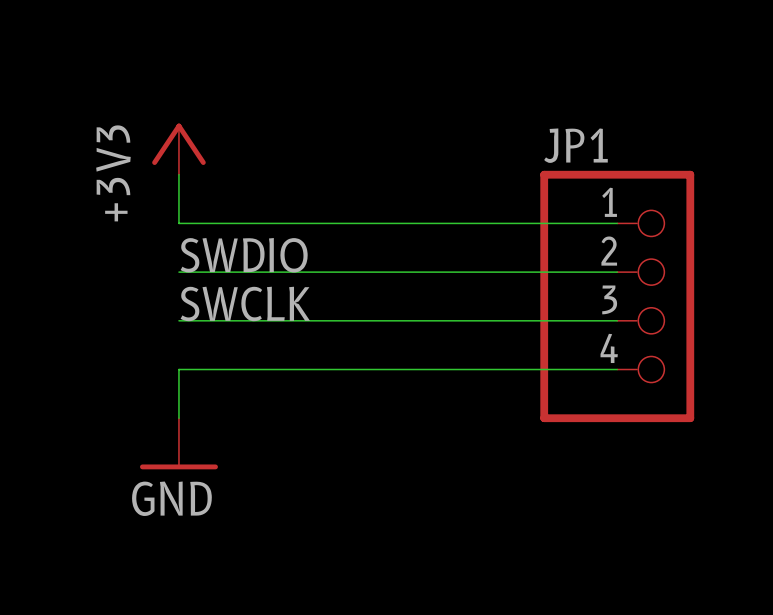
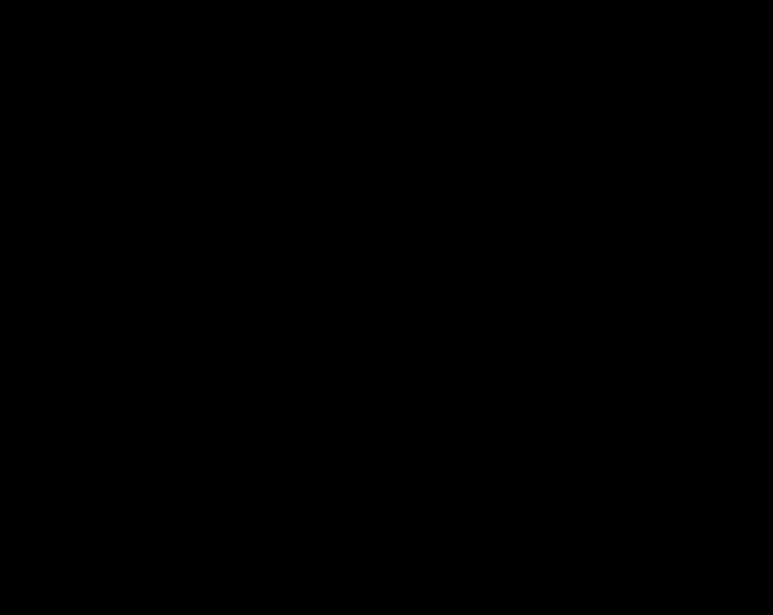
power symbol: +3V3 (178, 149) -> none
wire: (178, 174) (178, 223) (617, 223) -> none
label: SWDIO (244, 255) -> none
wire: (178, 272) (617, 272) -> none
JP1: (617, 296) -> none
label: SWCLK (245, 303) -> none
wire: (178, 320) (617, 320) -> none
wire: (617, 369) (178, 369) (178, 418) -> none
power symbol: GND (178, 443) -> none

